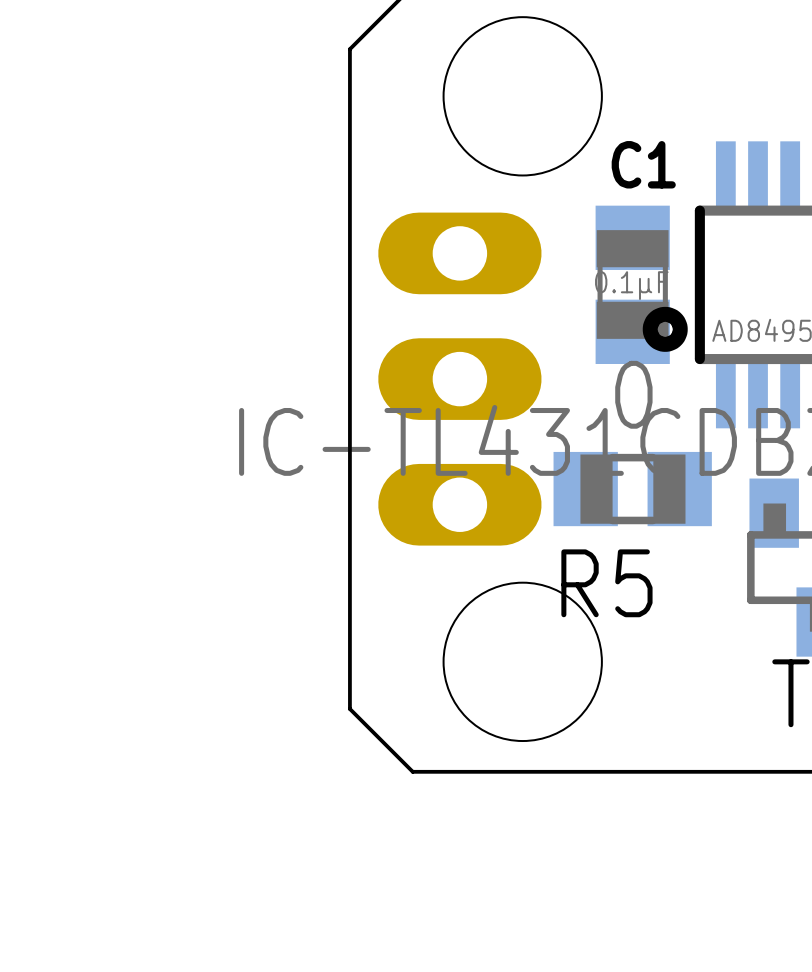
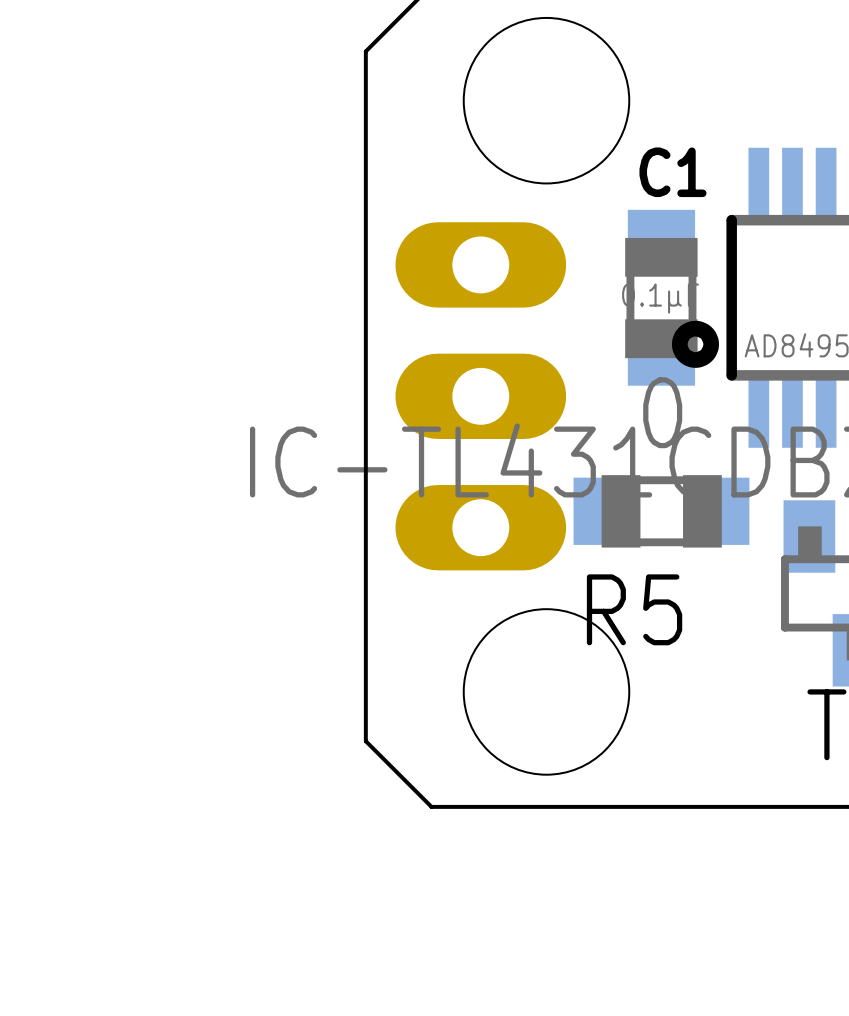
C1 footprint: [595, 205, 670, 364] -> [625, 209, 698, 386]
R5 footprint: [553, 451, 712, 527] -> [573, 475, 750, 548]

